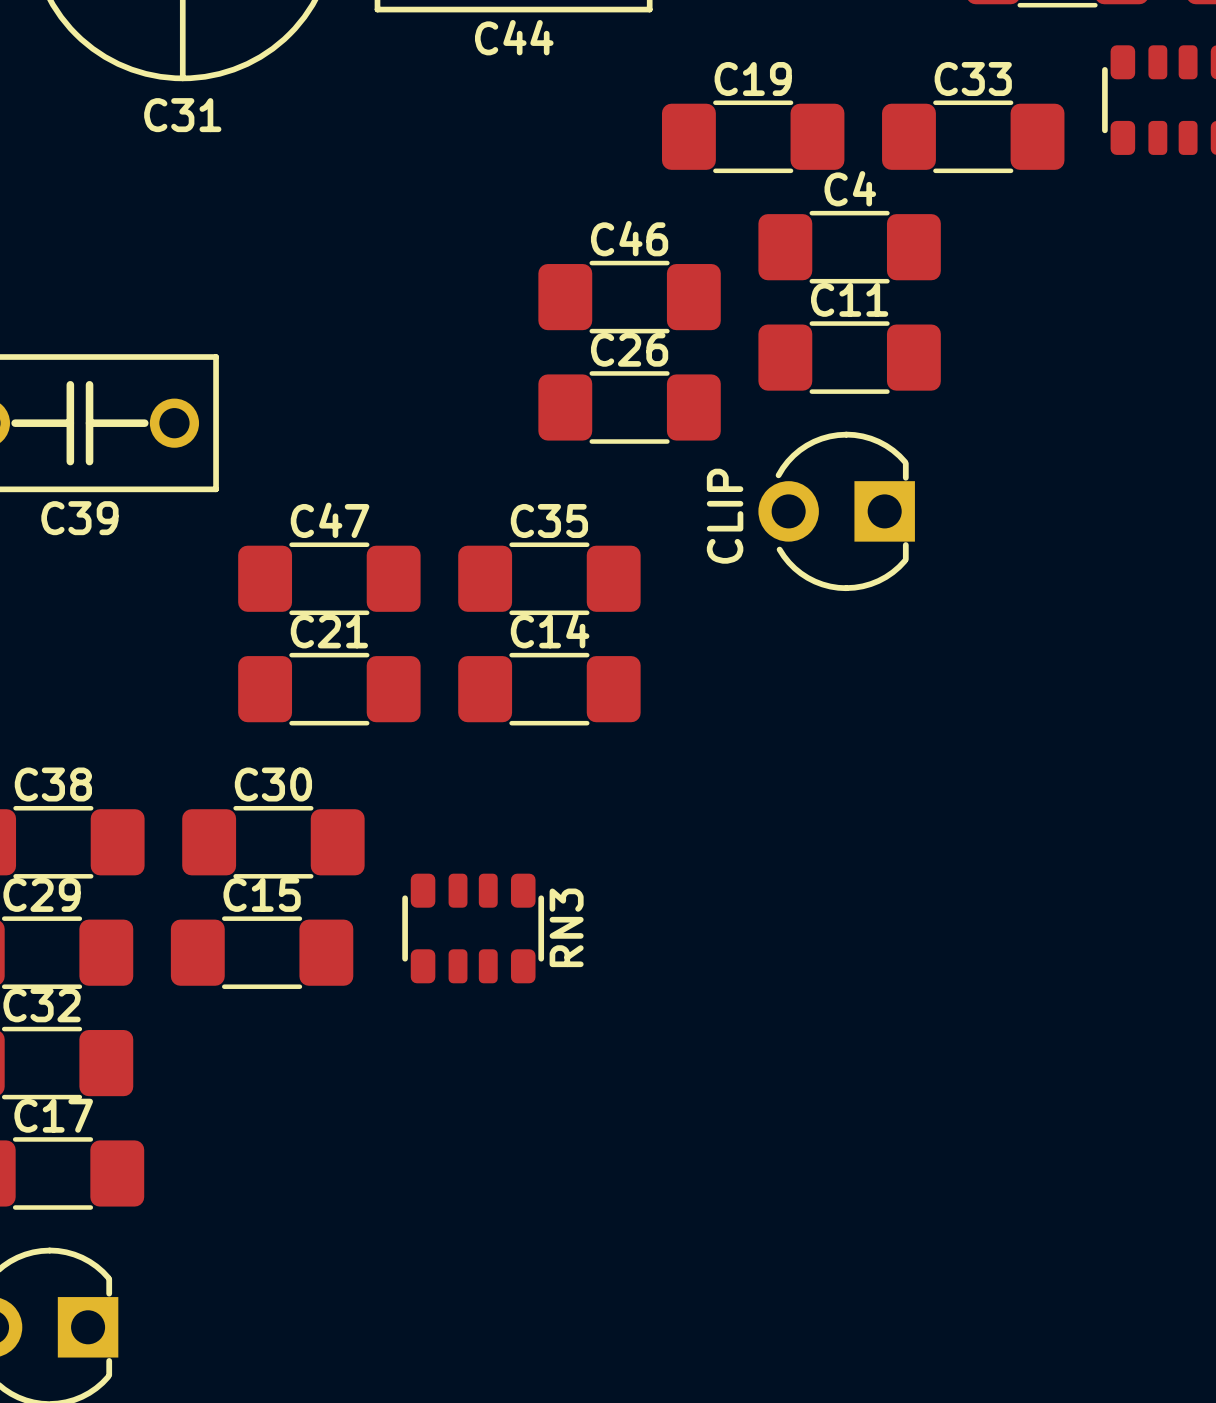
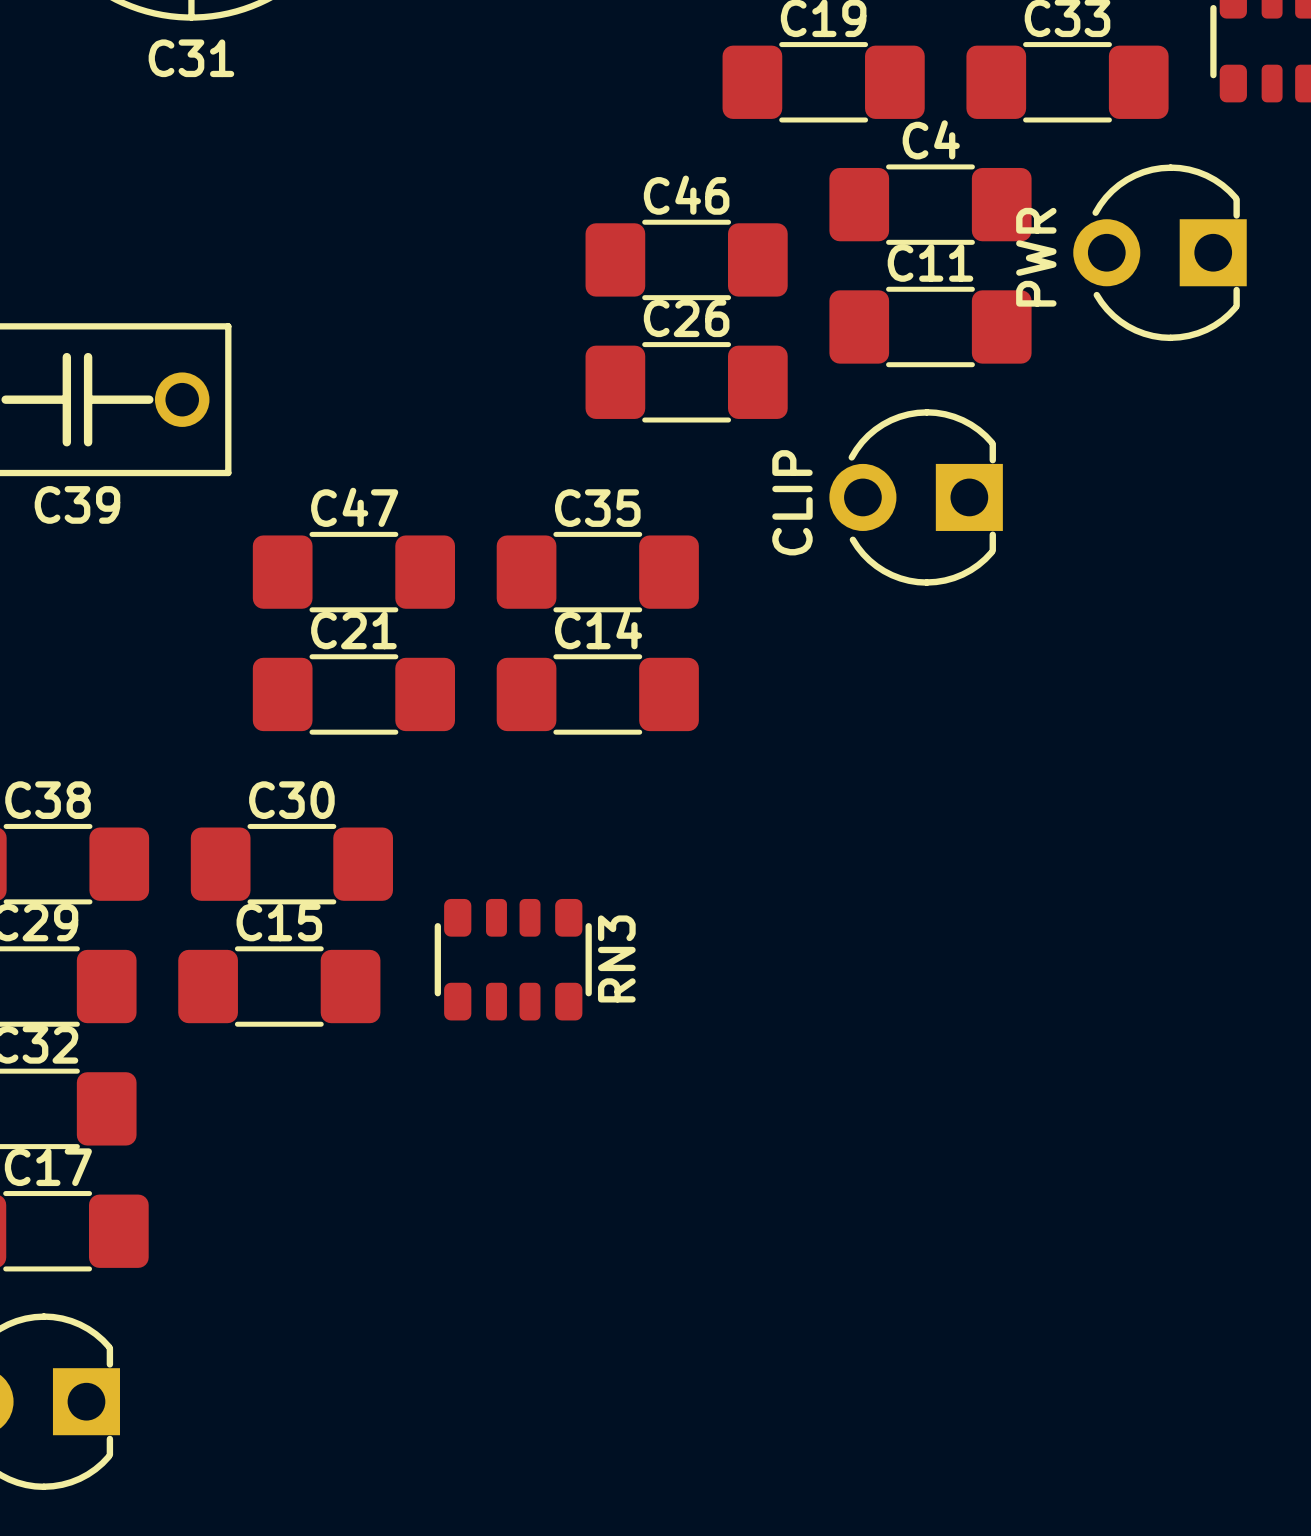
part: none -> PWR (1160, 252)

